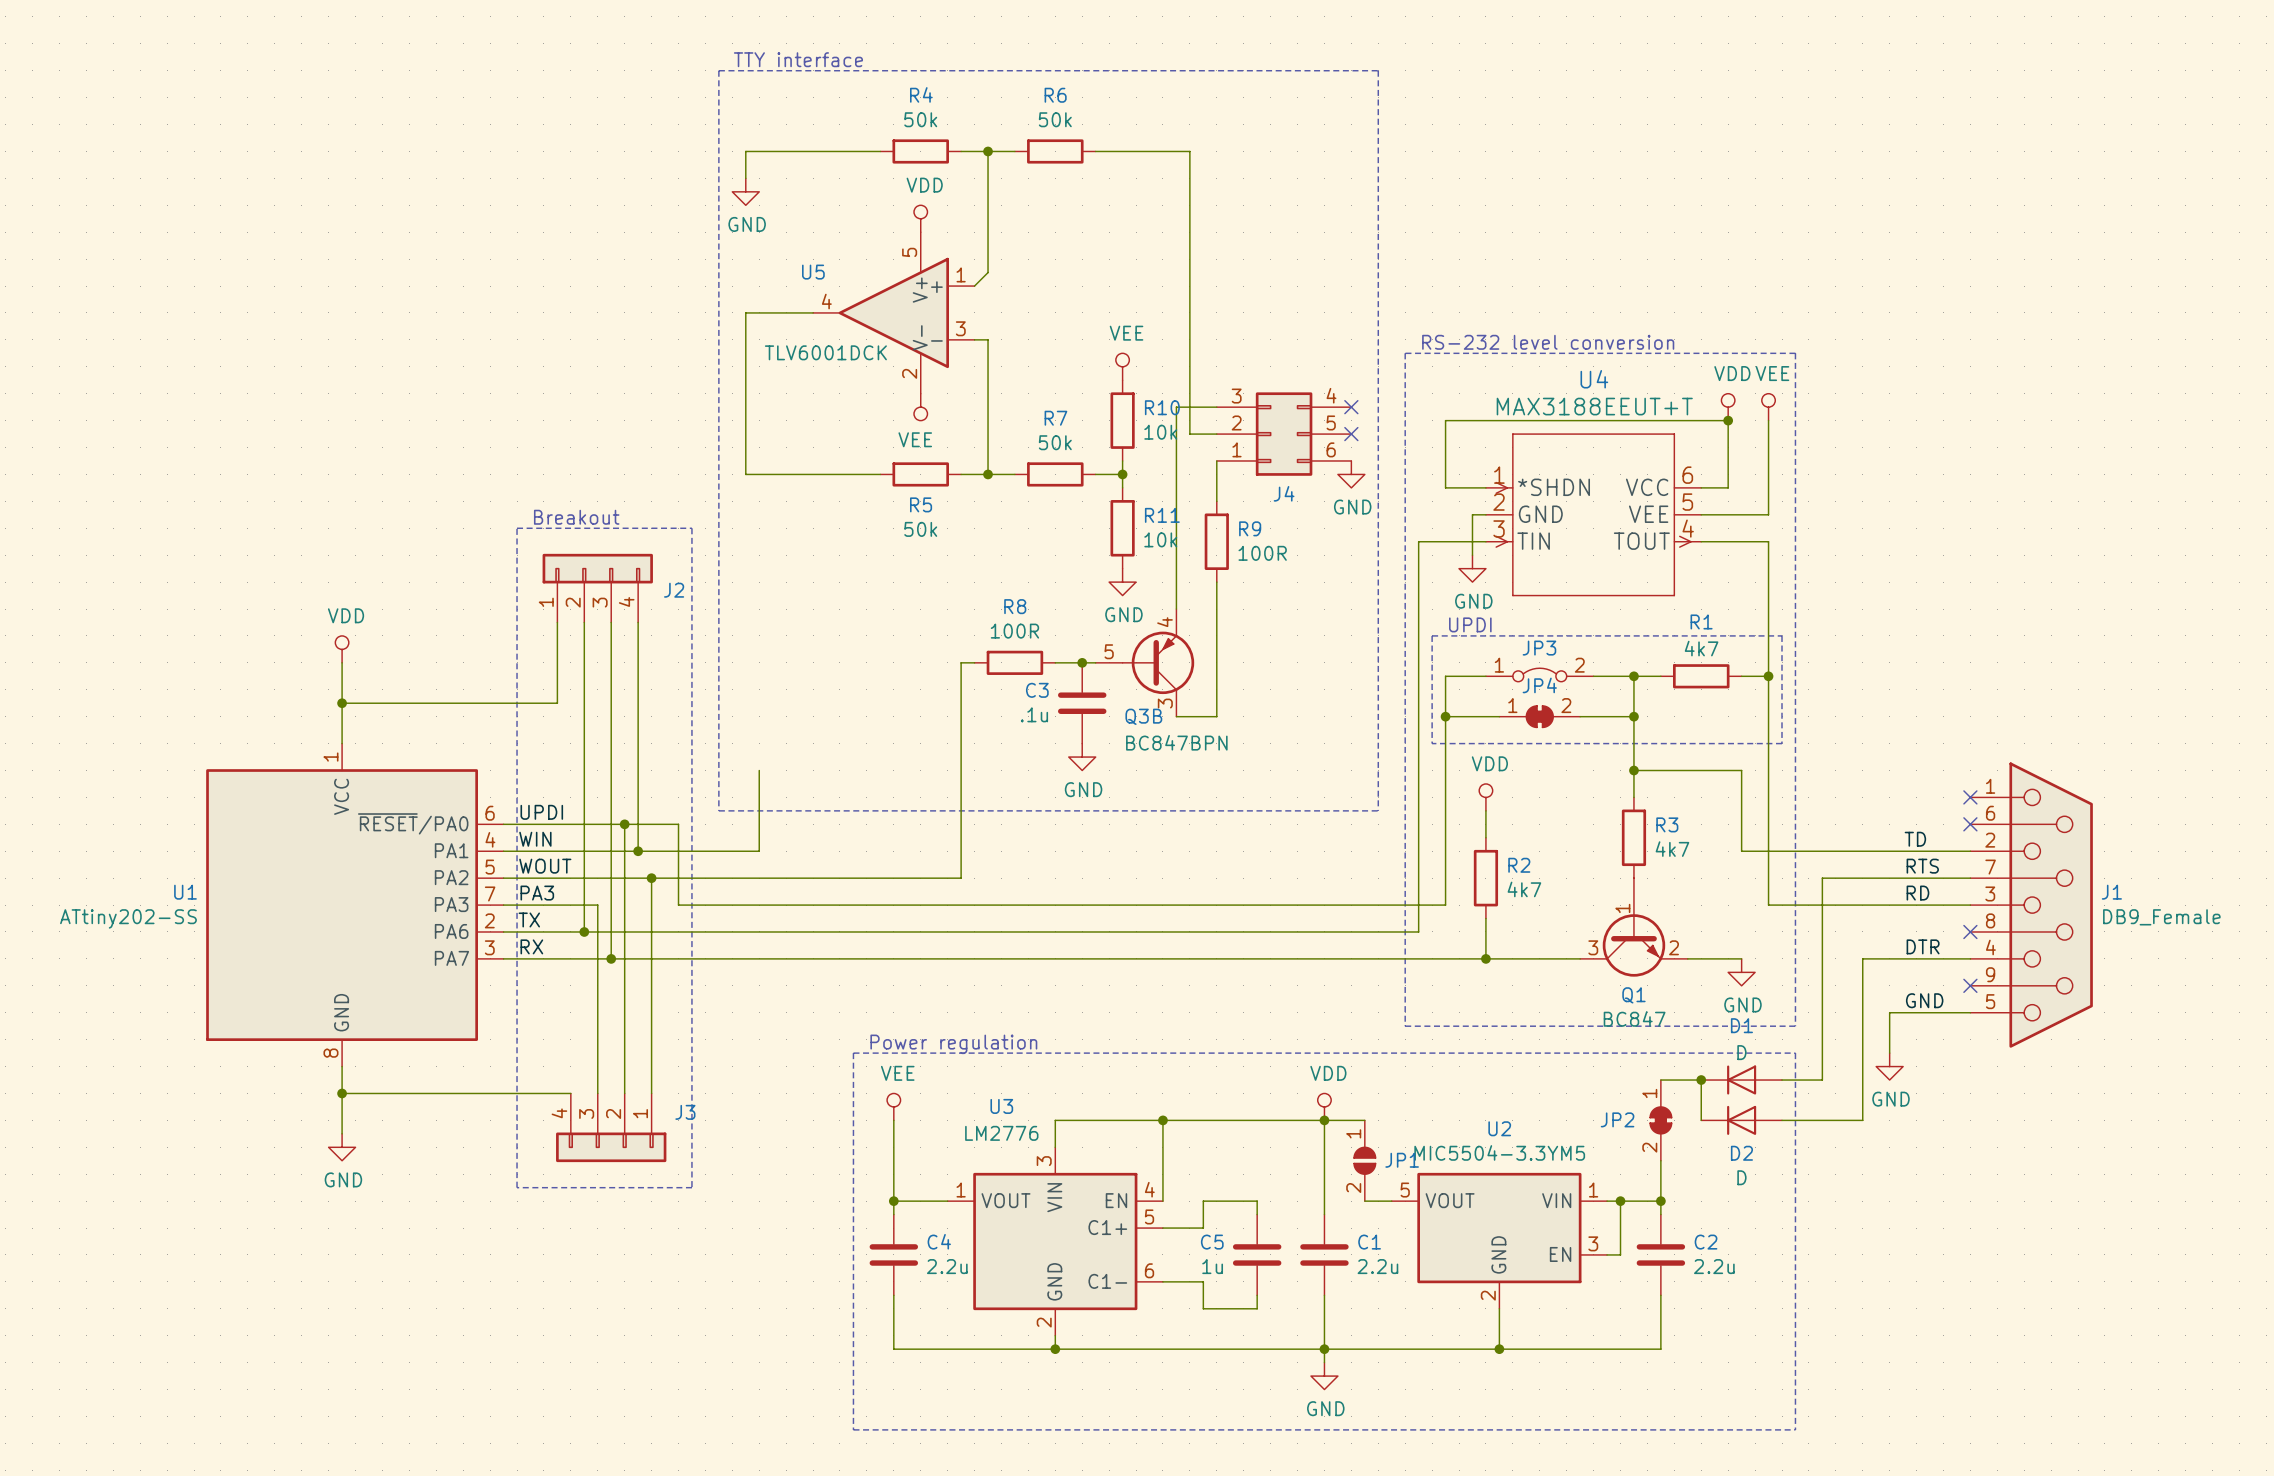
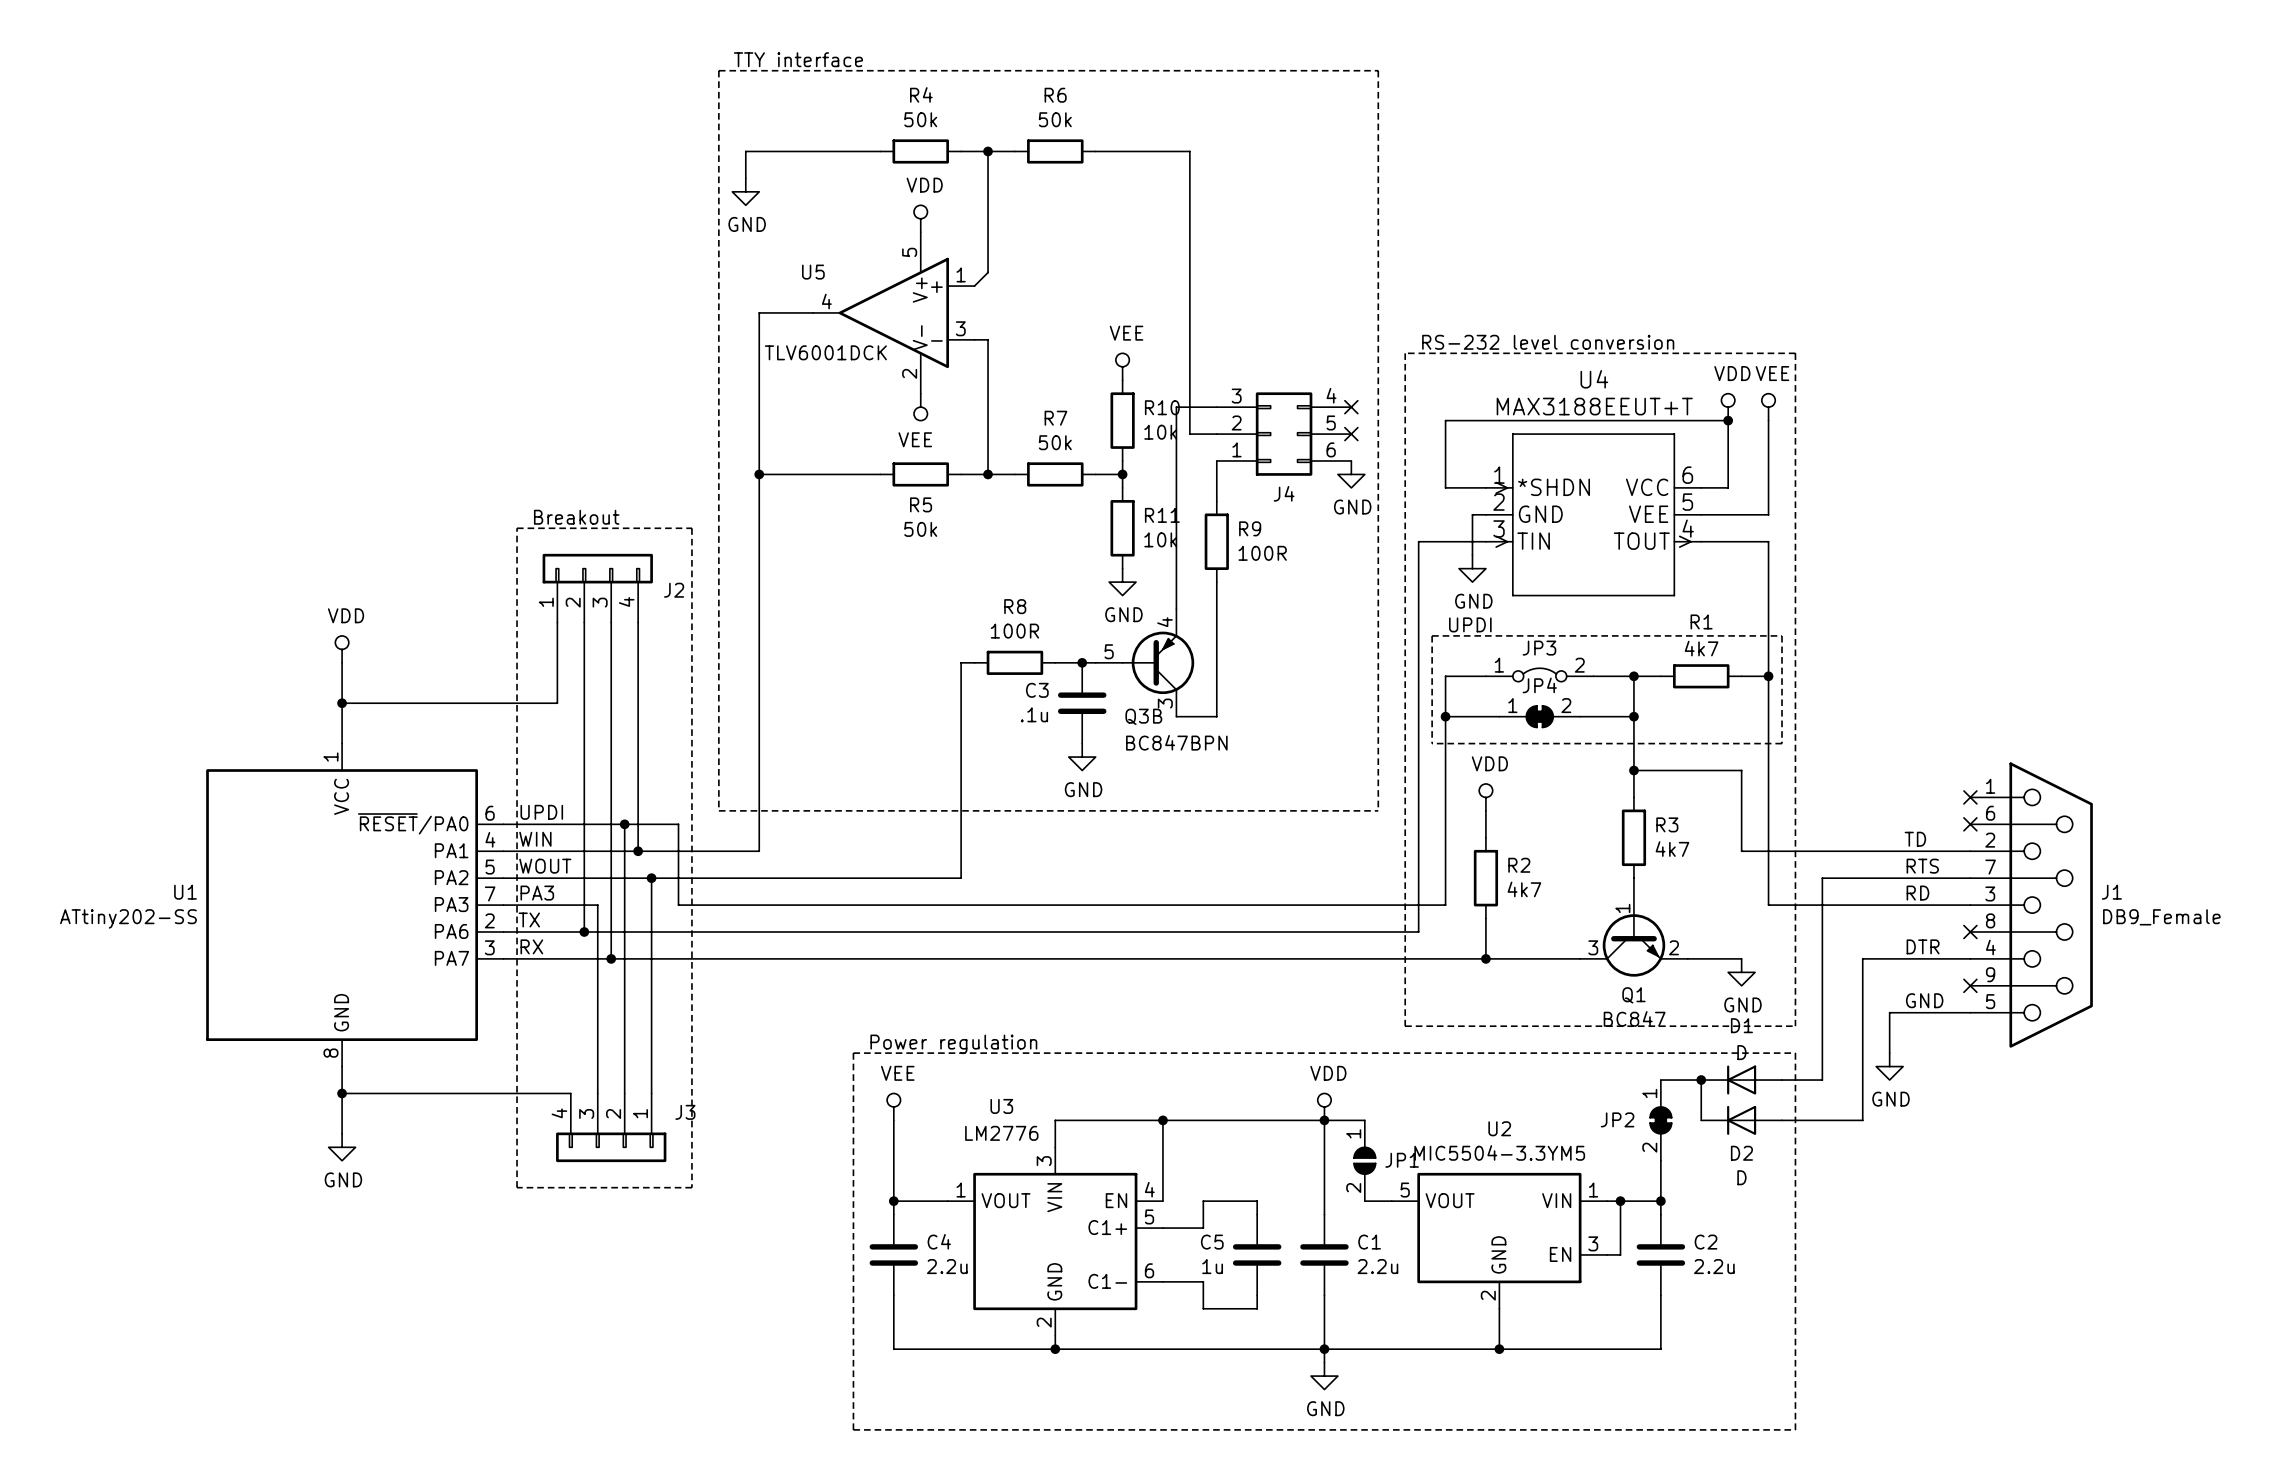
wire: (759, 312) (745, 312) (745, 474) (759, 474) -> (759, 312) (759, 770)
junction: none -> (759, 474)

